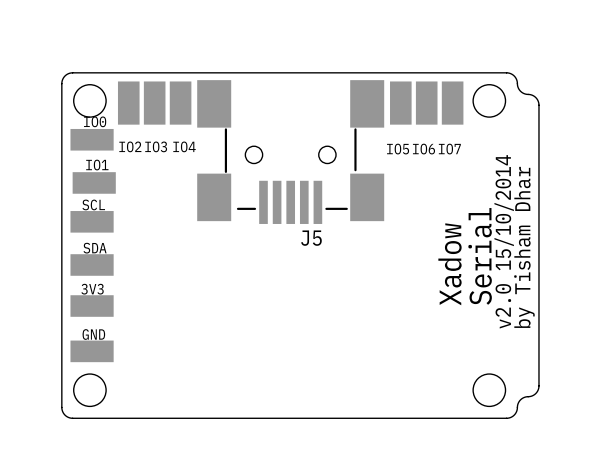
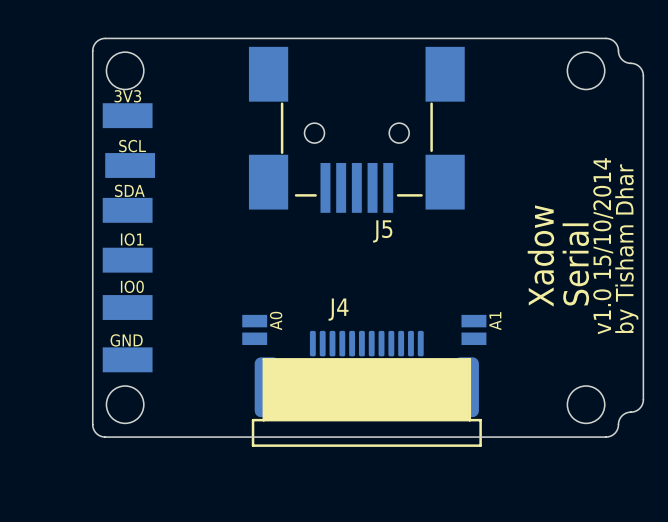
IO2: (128, 103) -> none
IO3: (154, 103) -> none
IO4: (180, 103) -> none
IO5: (400, 103) -> none
IO6: (426, 103) -> none
IO7: (452, 103) -> none
IO0 name: IO0 (95, 121) -> 3V3 (127, 96)
IO1 name: IO1 (97, 165) -> SCL (132, 146)
SCL name: SCL (93, 204) -> SDA (129, 190)
text: v2.0 15/10/2014 (504, 241) -> v1.0 15/10/2014 (603, 246)
SDA name: SDA (95, 248) -> IO1 (132, 239)
3V3 name: 3V3 (92, 289) -> IO0 (132, 286)
A0: none -> (254, 329)
A1: none -> (473, 329)
J4: none -> (366, 388)

